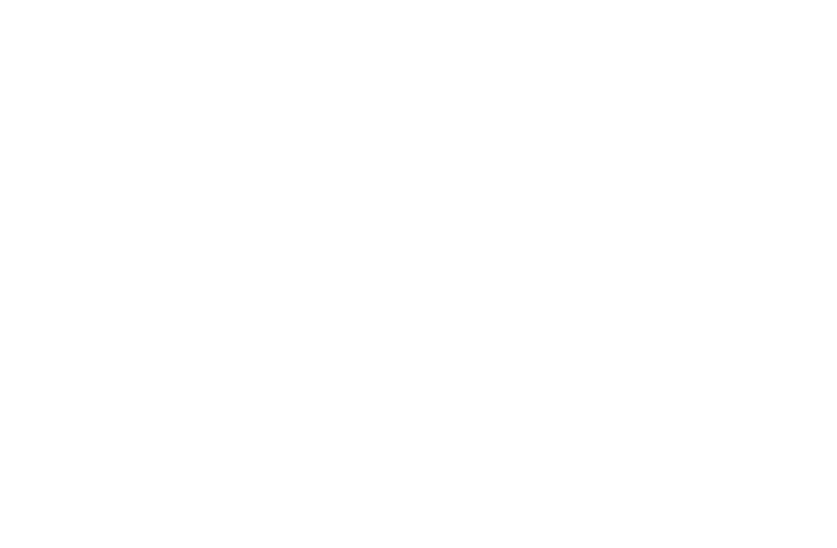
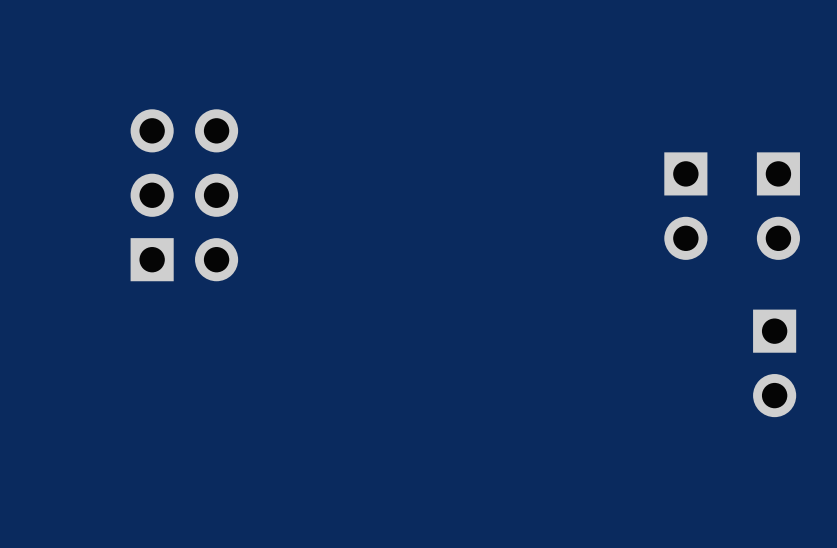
part: none -> (184, 195)
part: none -> (685, 206)
part: none -> (778, 206)
part: none -> (774, 363)

